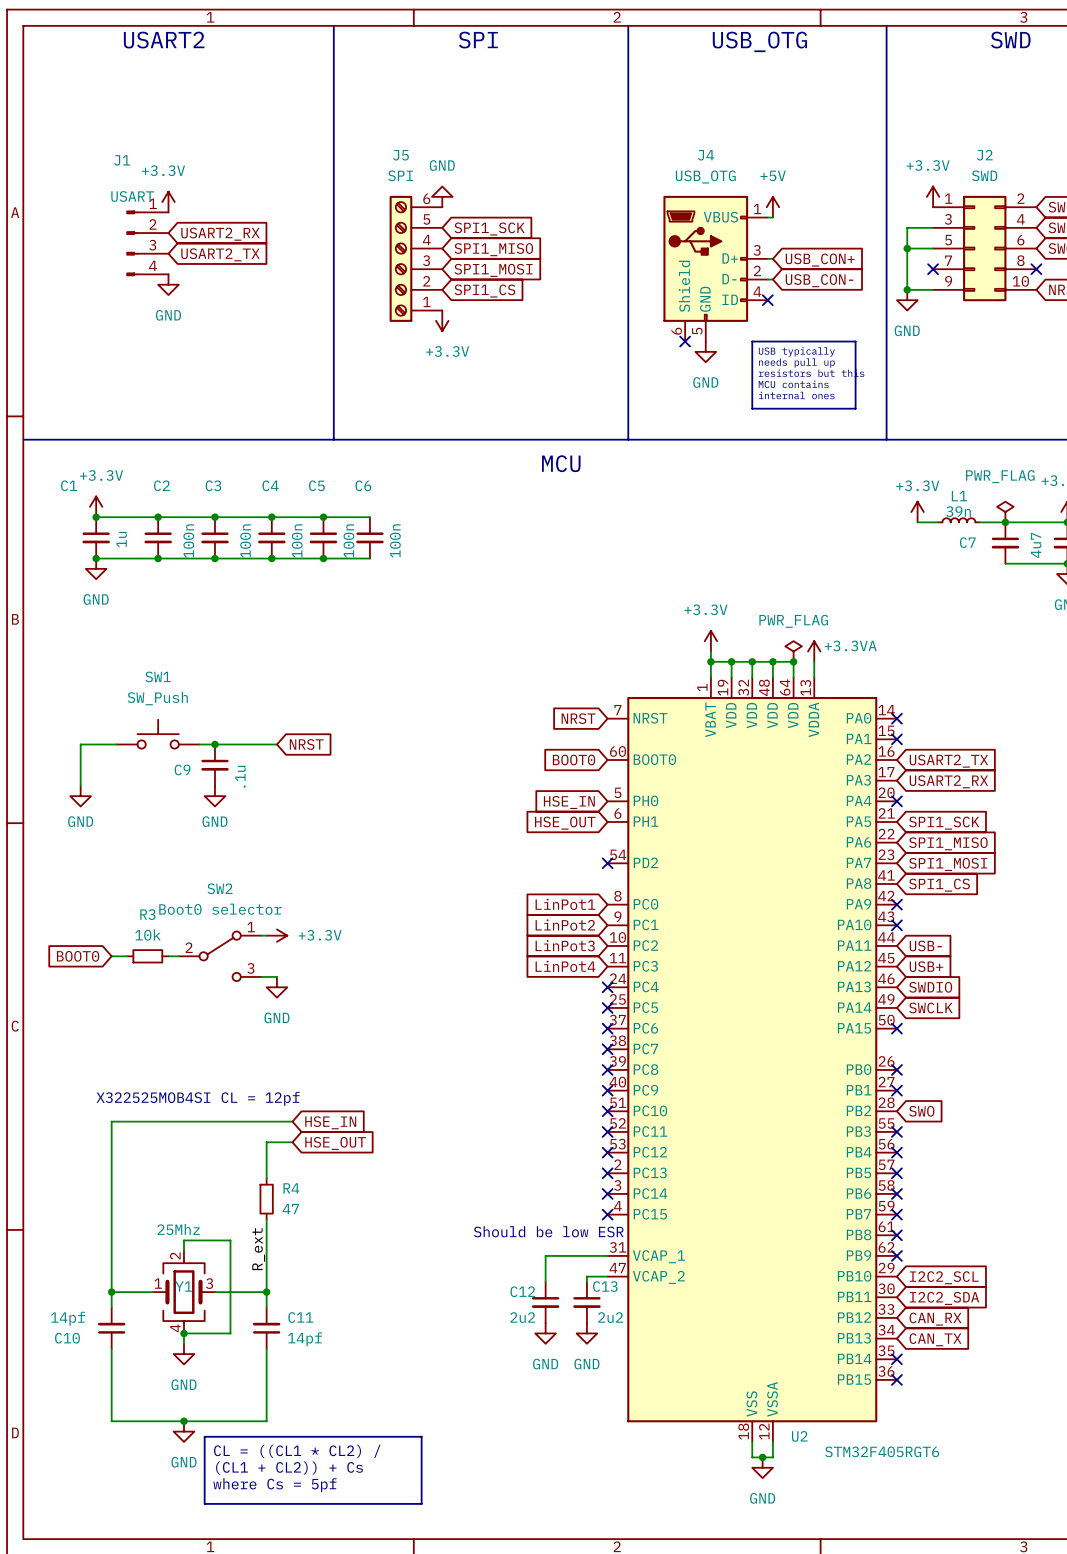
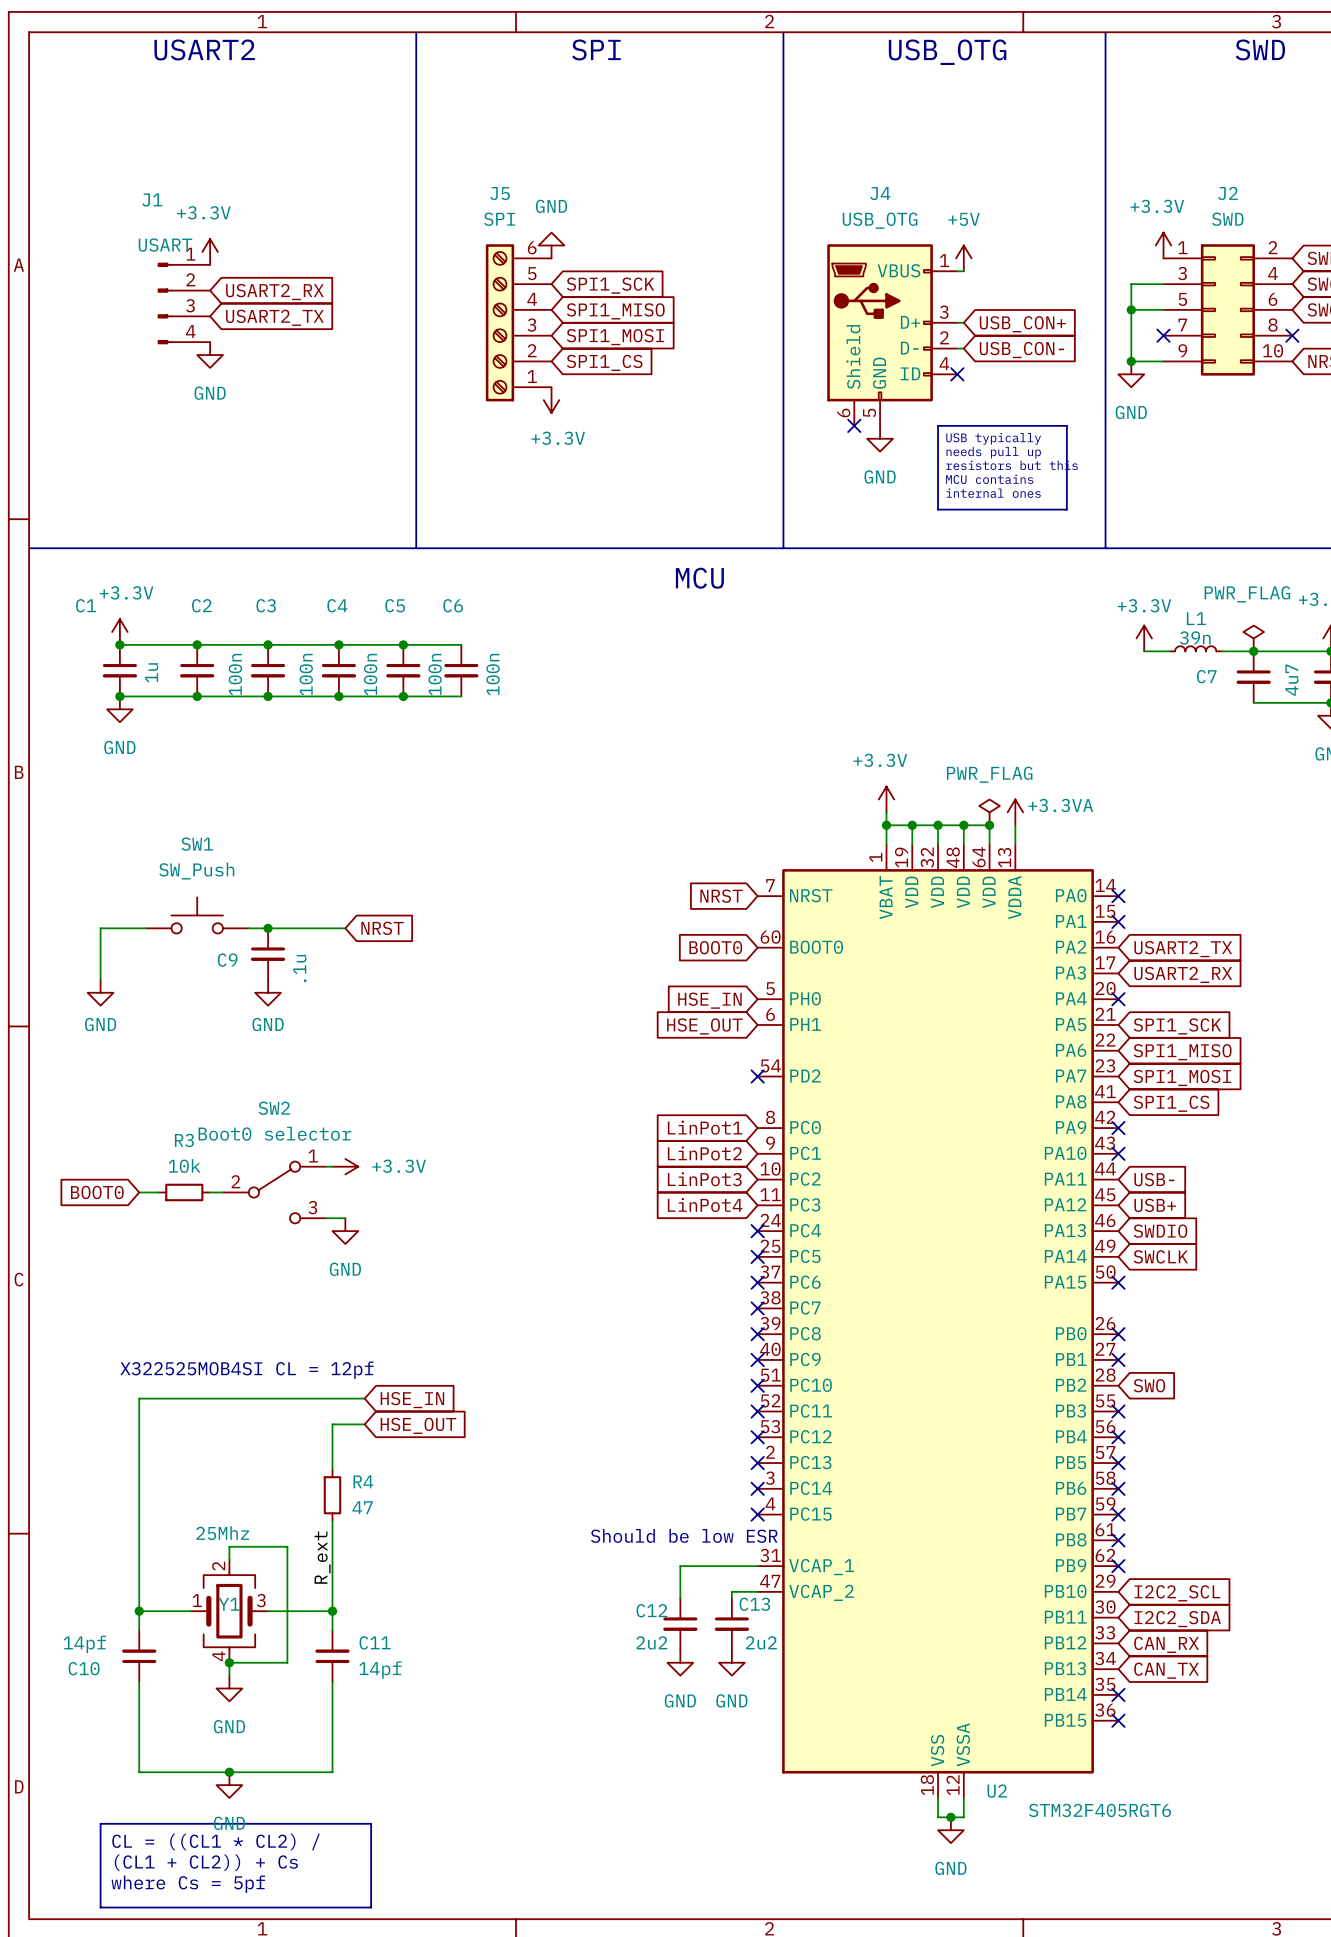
line: (204, 1436) (421, 1436) (421, 1503) (204, 1503) (204, 1436) -> (100, 1823) (371, 1823) (371, 1907) (100, 1907) (100, 1823)
text position: CL = ((CL1 * CL2) / (297, 1451) -> CL = ((CL1 * CL2) / (216, 1841)
text position: (CL1 + CL2)) + Cs (289, 1467) -> (CL1 + CL2)) + Cs (206, 1862)
text position: where Cs = 5pf (275, 1485) -> where Cs = 5pf (188, 1884)

